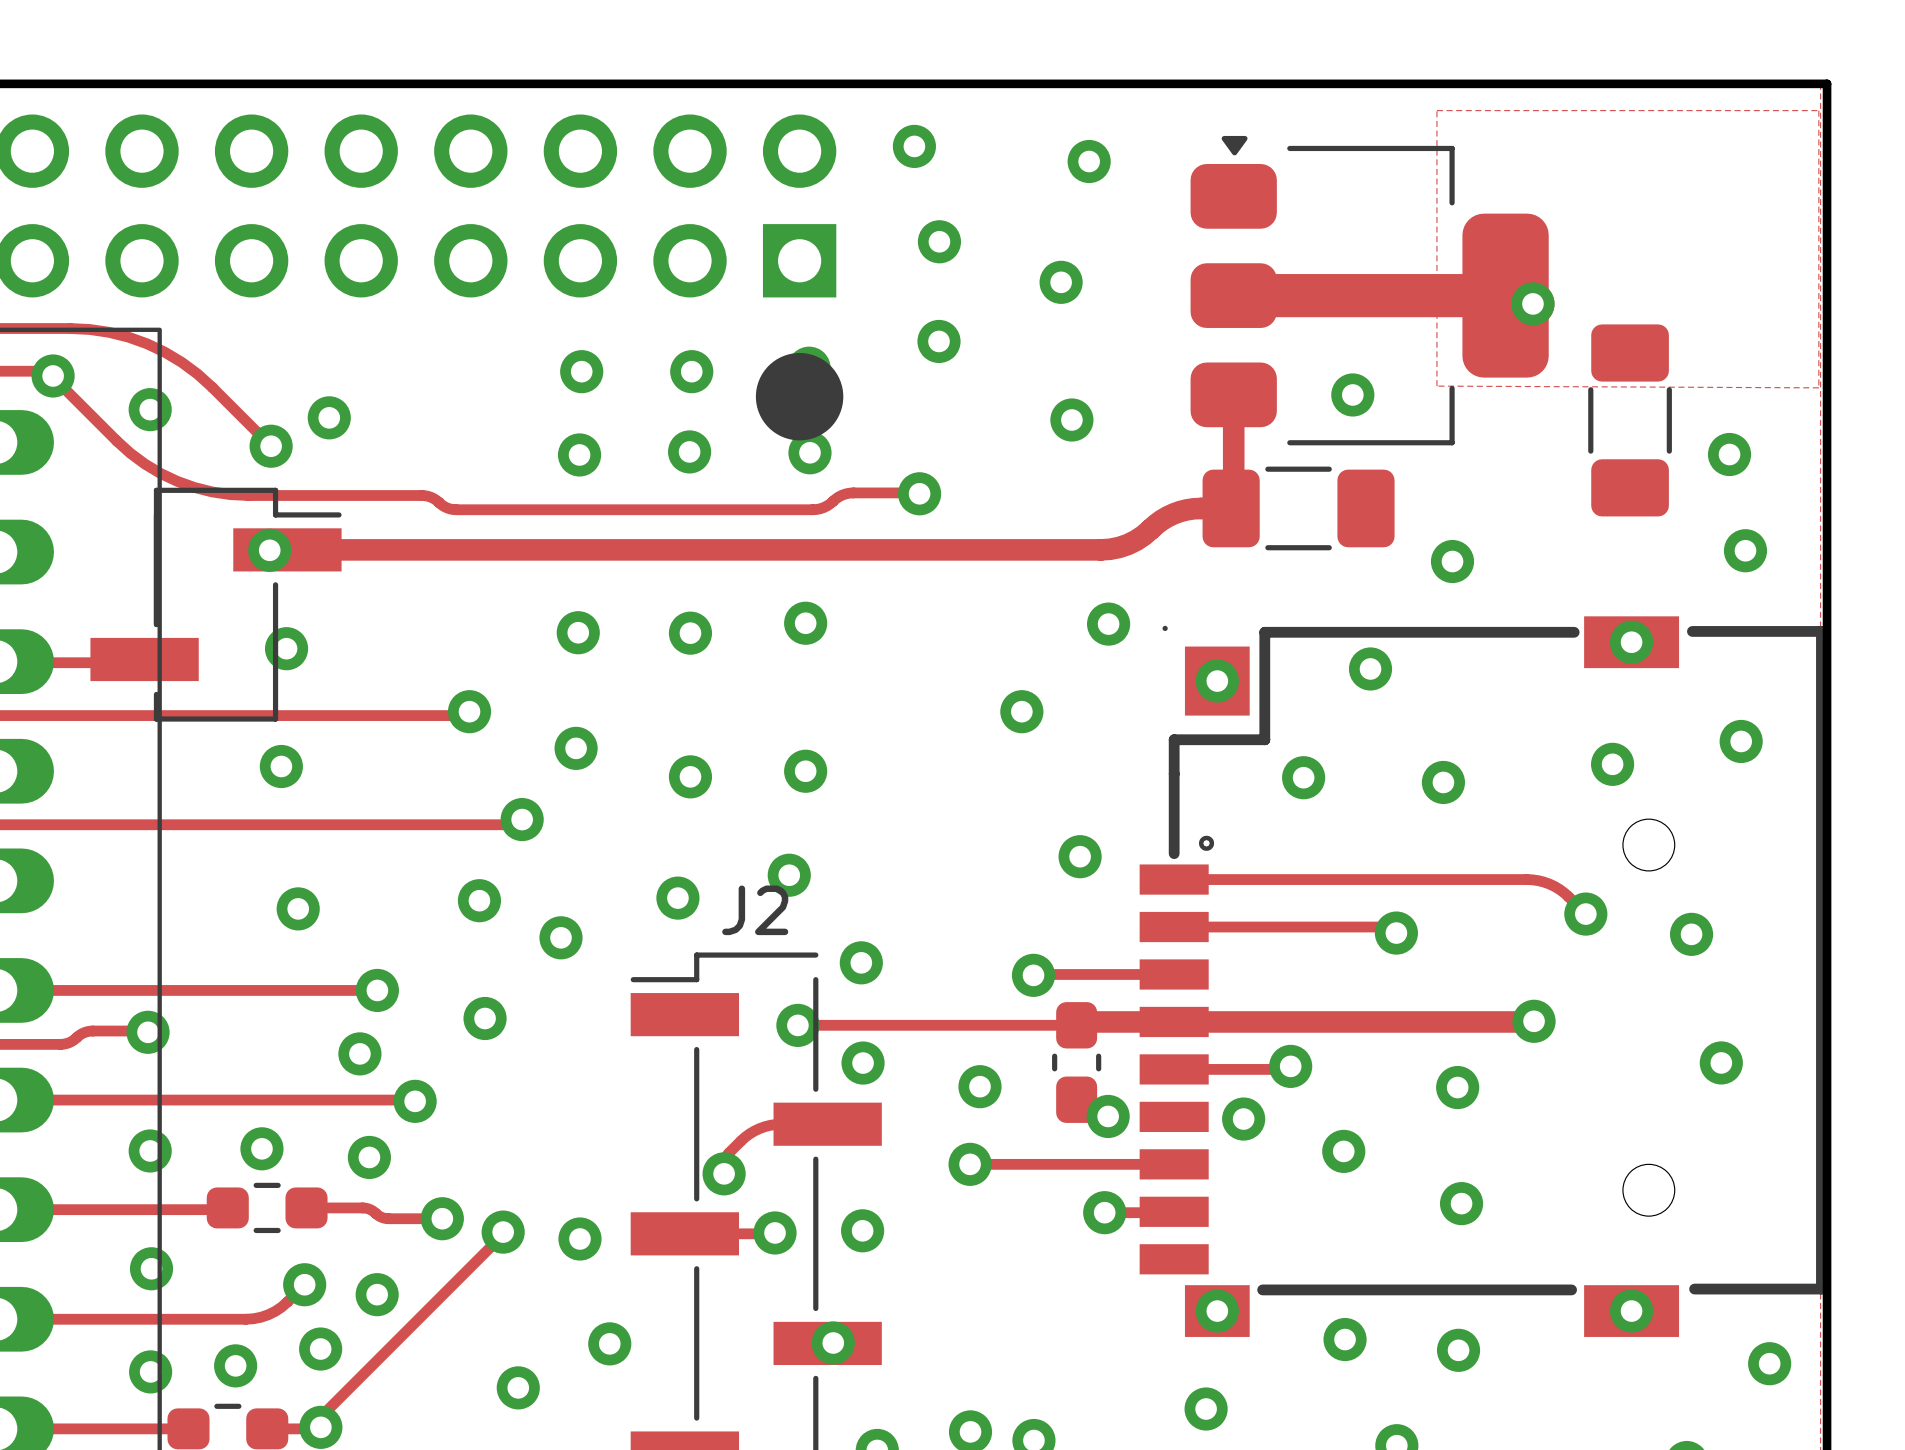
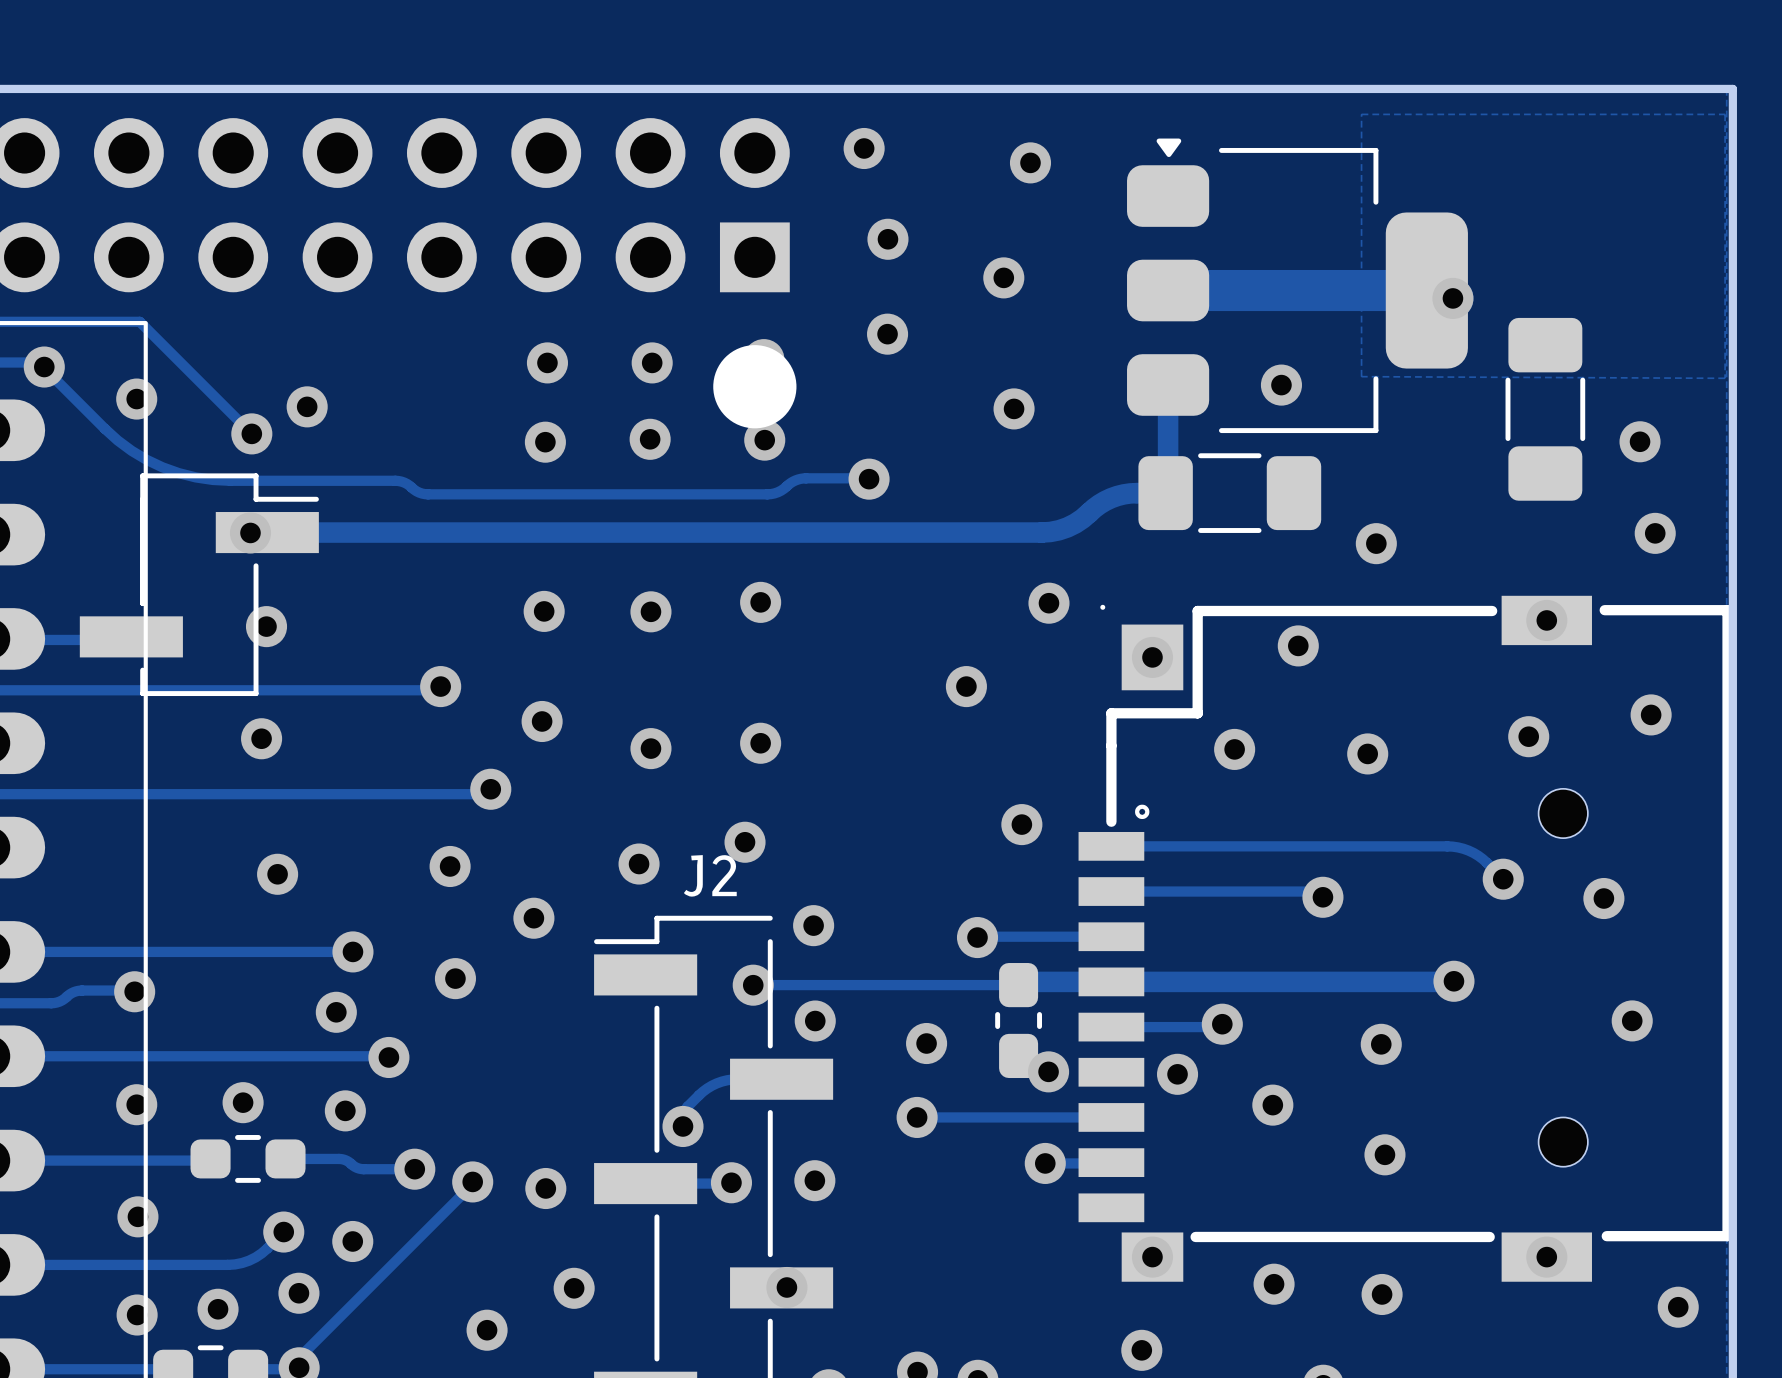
track: (70, 328) (109, 332) (147, 343) (181, 362) (212, 387) -> (60, 321) (139, 321) (195, 377)
via position: (561, 937) -> (533, 918)

